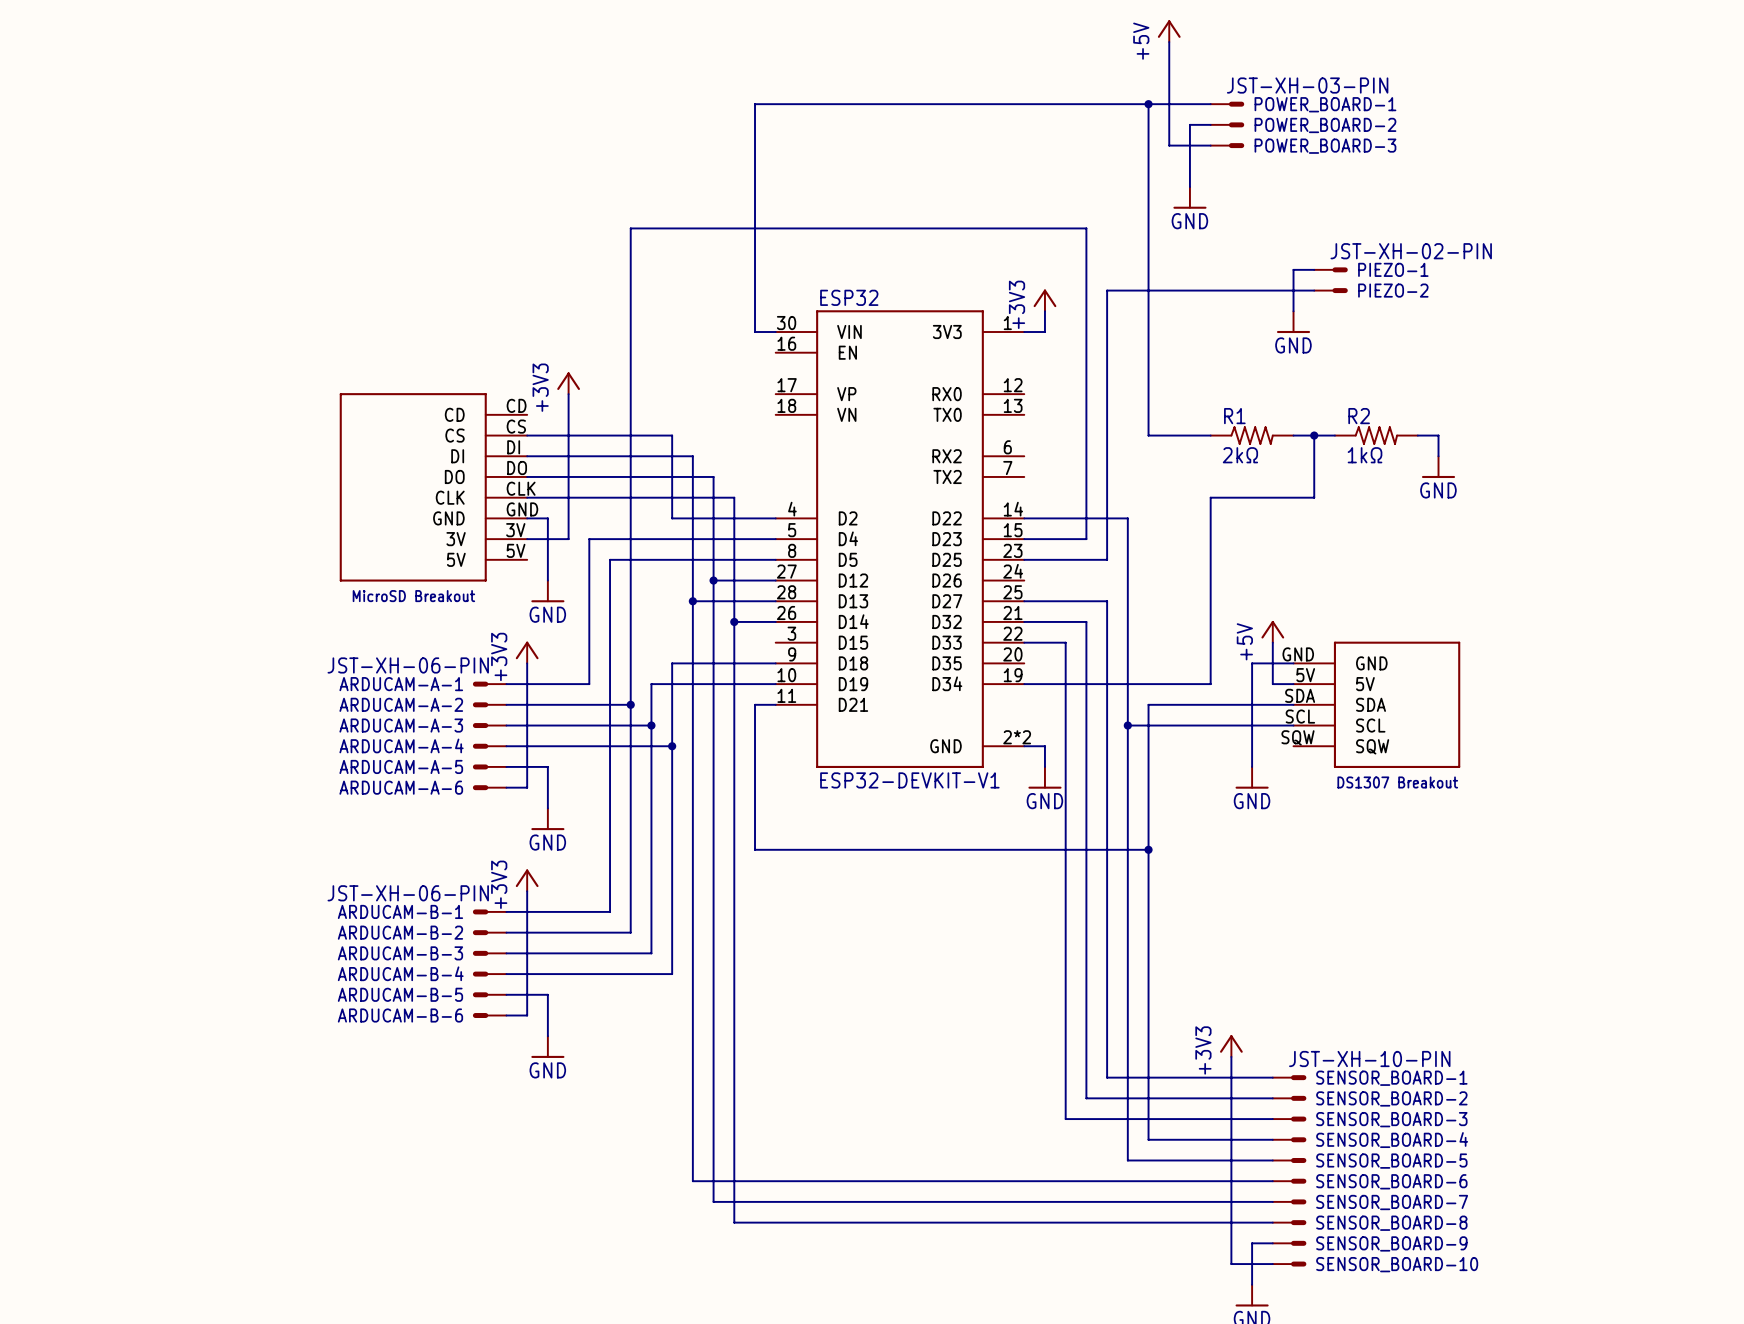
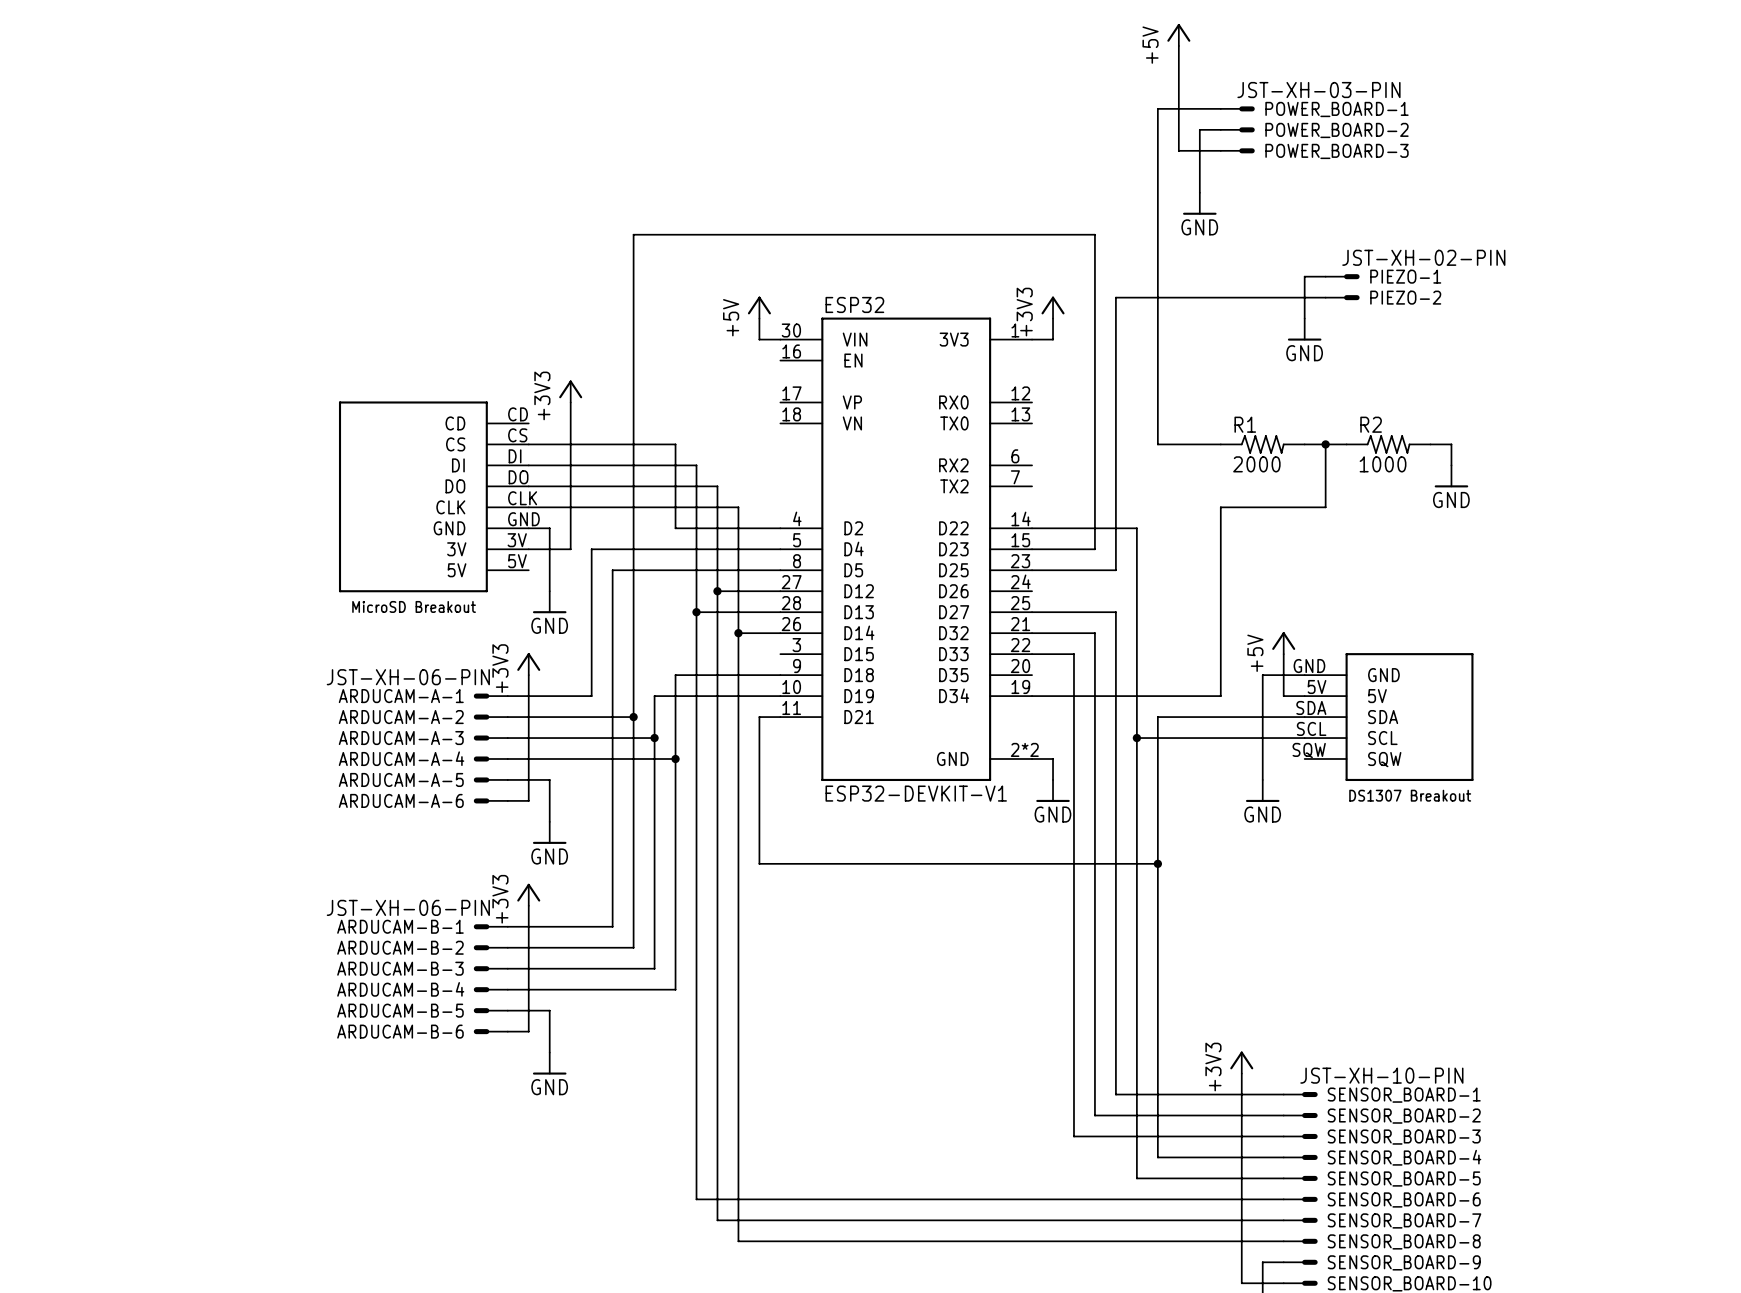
wire: (1148, 104) (755, 104) (755, 311) -> none
junction: (1148, 104) -> none
power symbol: none -> +5V (759, 307)
R1 value: 2kΩ (1240, 455) -> 2000 (1256, 464)
R2 value: 1kΩ (1365, 455) -> 1000 (1383, 464)

